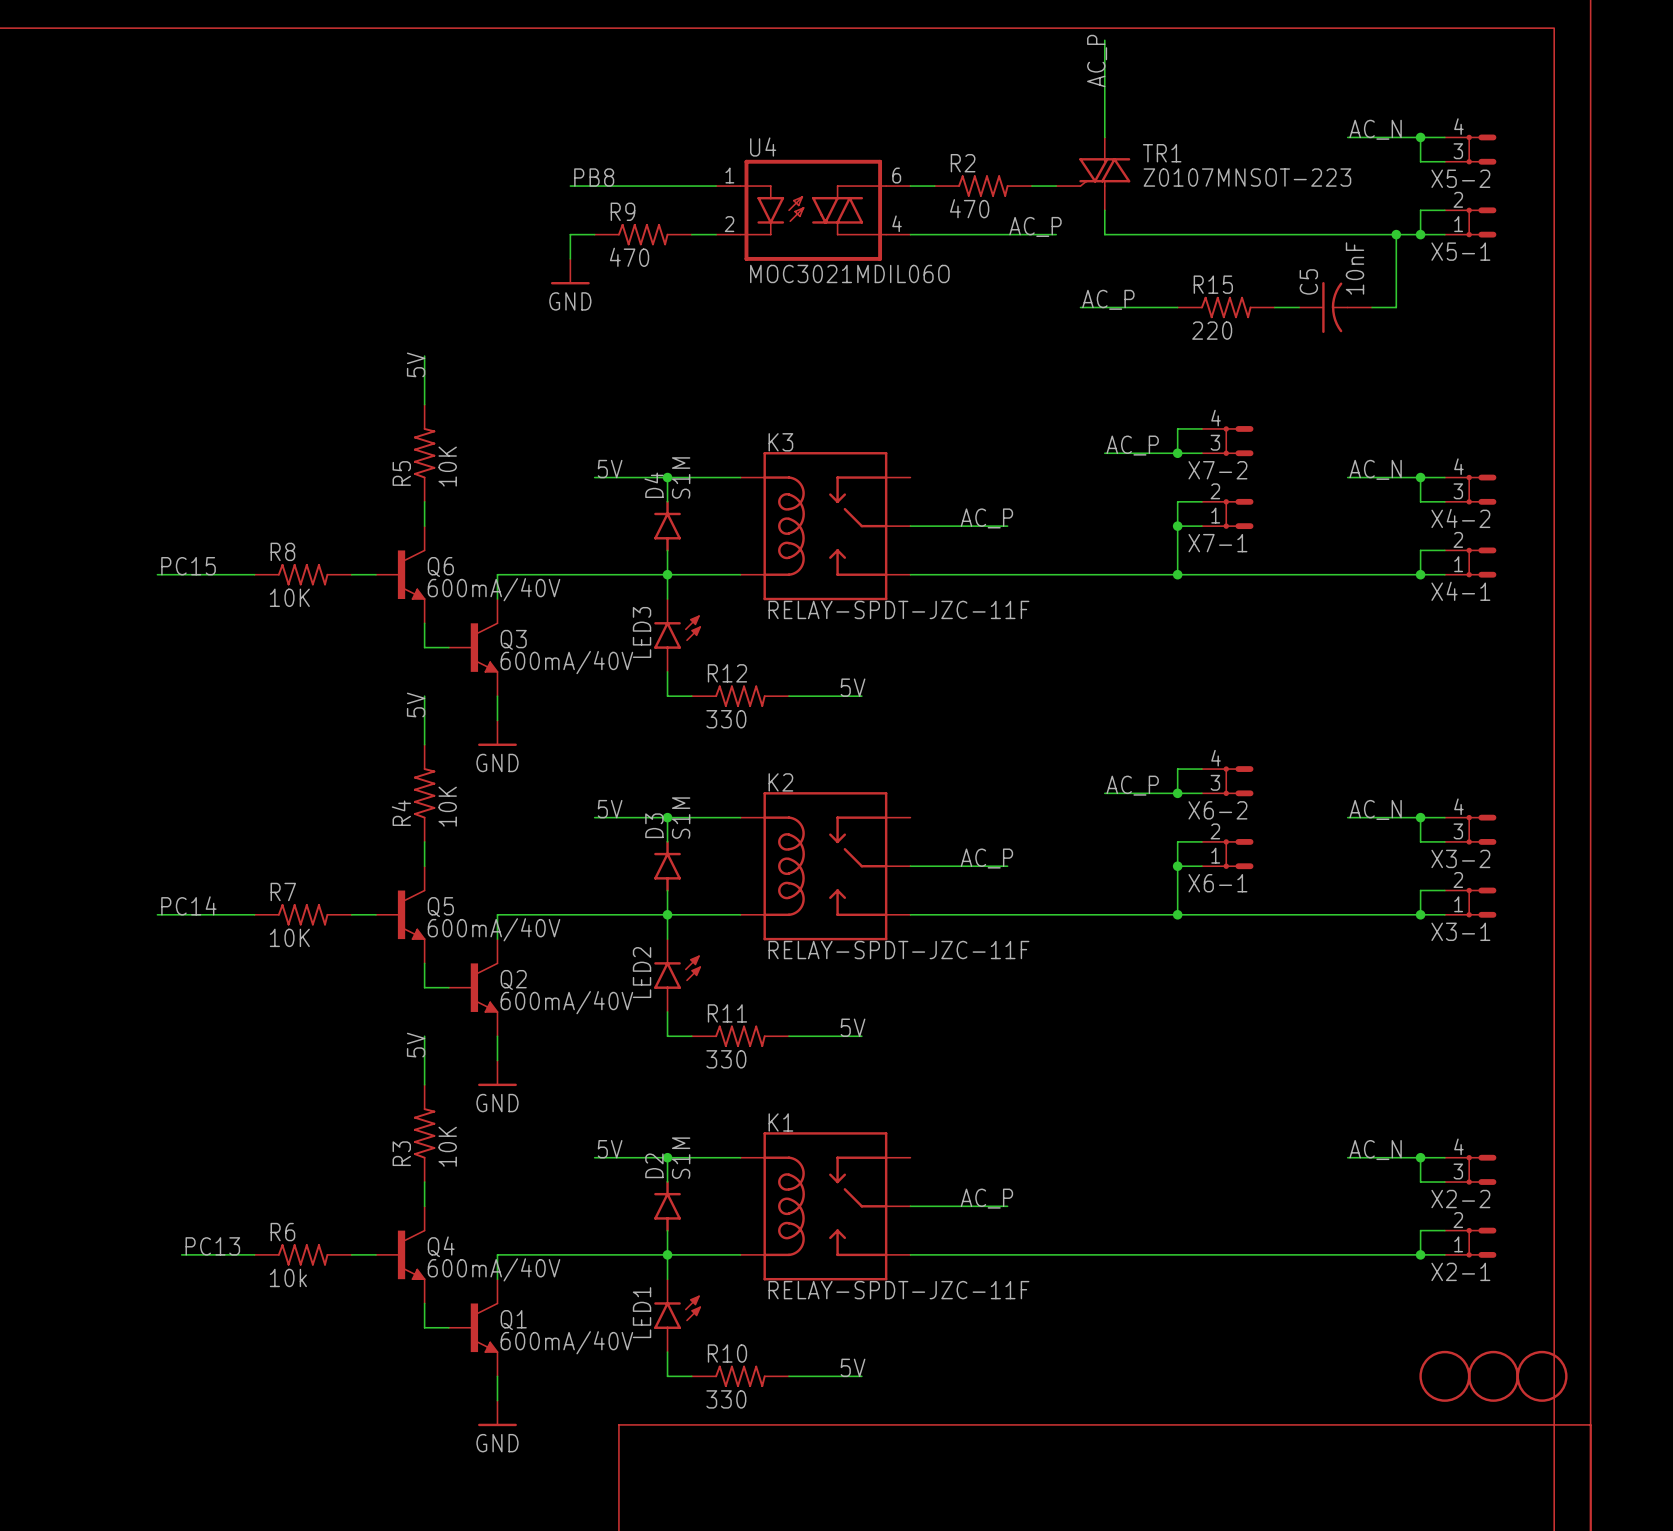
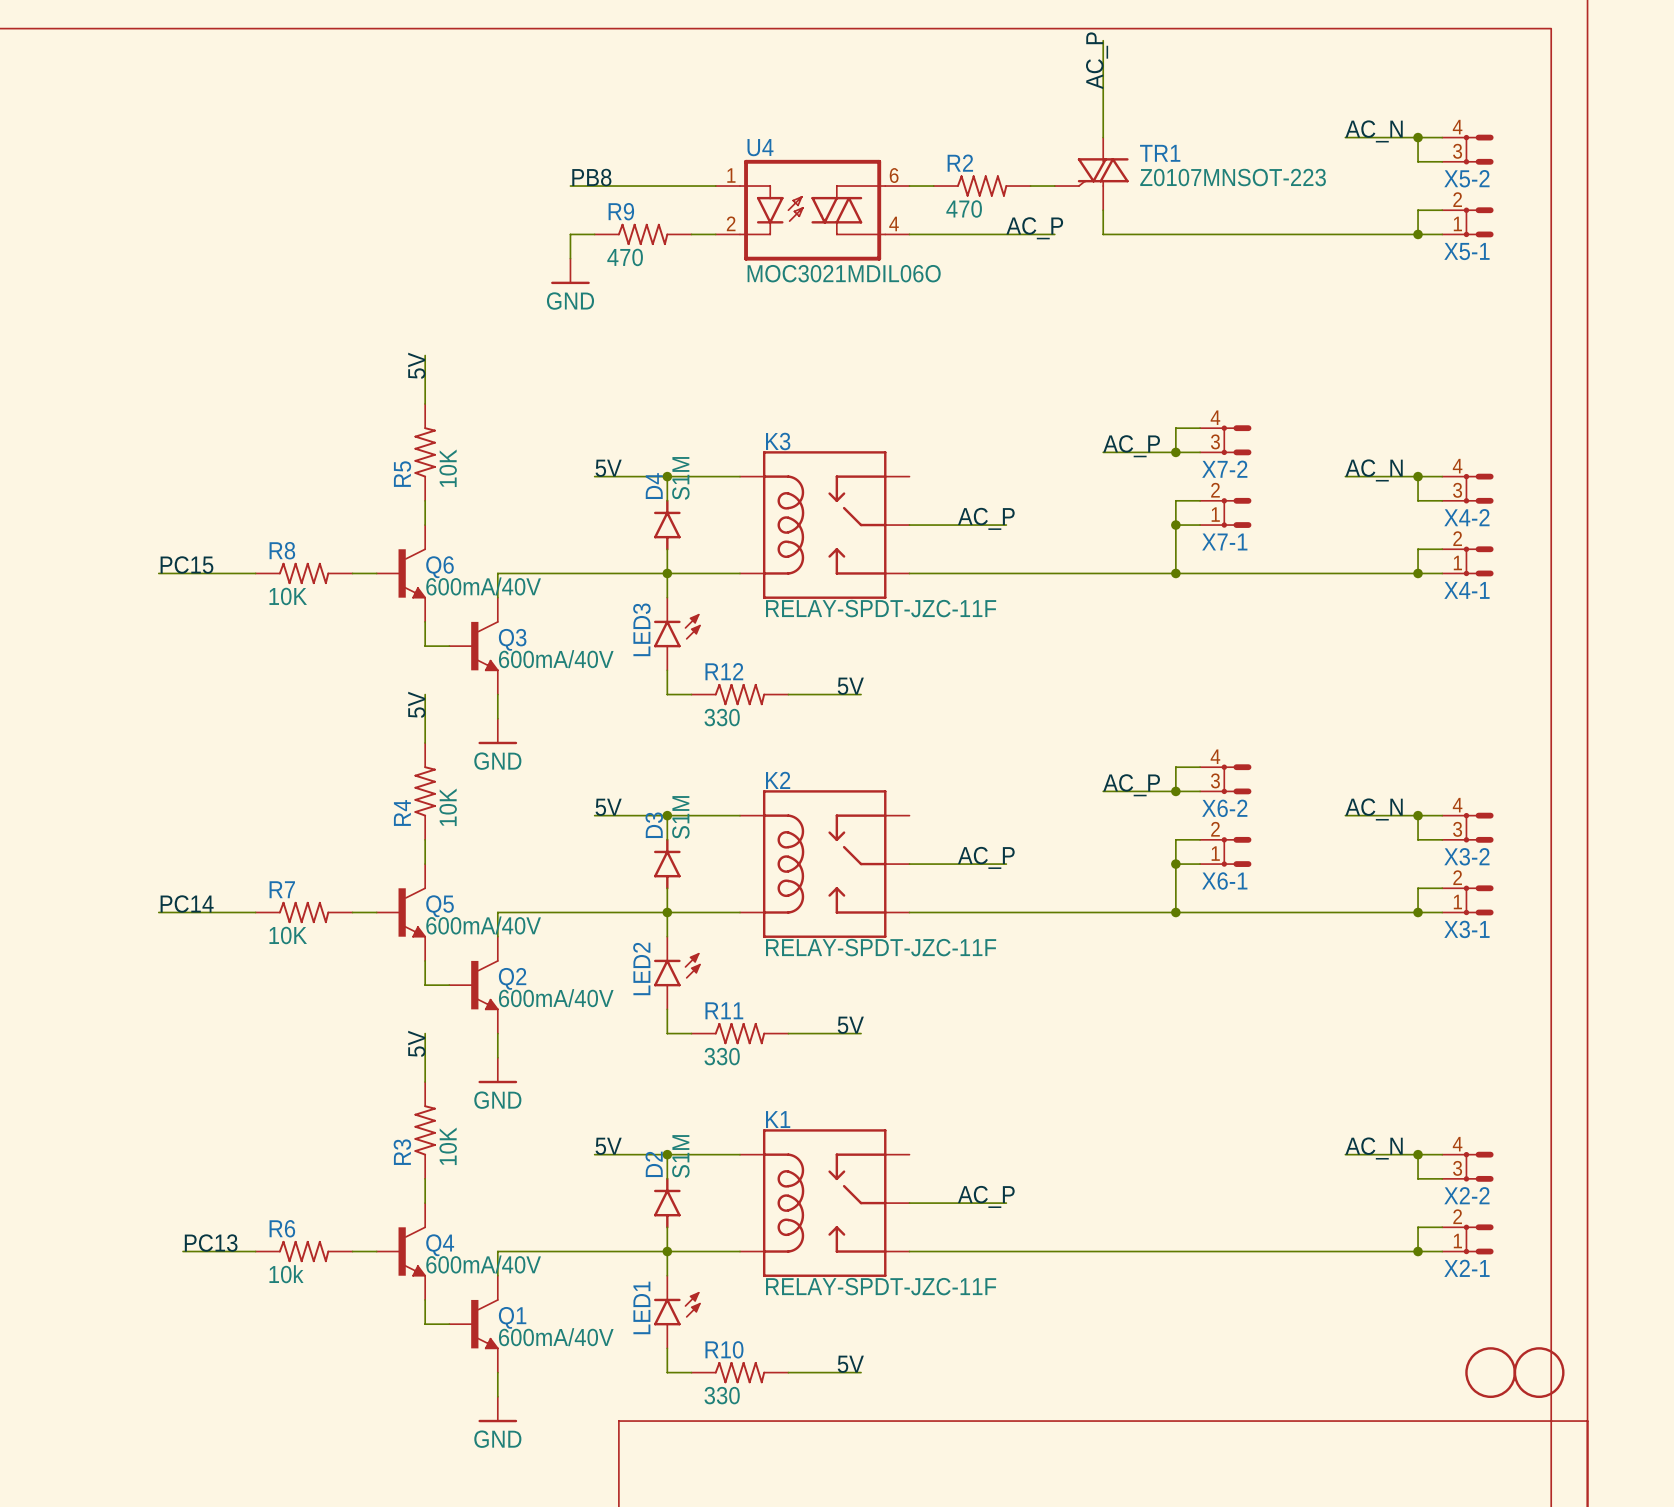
wire: (1396, 234) (1396, 307) (1372, 307) -> none
junction: (1396, 234) -> none
label: AC_P (1108, 299) -> none
wire: (1080, 307) (1177, 307) -> none
R15: 220 (1226, 307) -> none
wire: (1274, 307) (1299, 307) -> none
C5: 10nF (1335, 307) -> none
part: (1444, 1376) -> none

